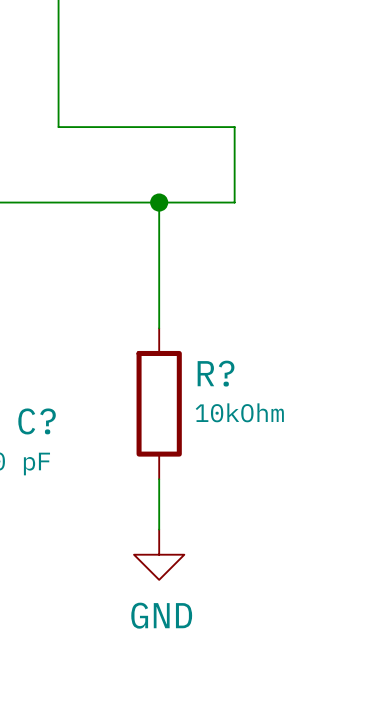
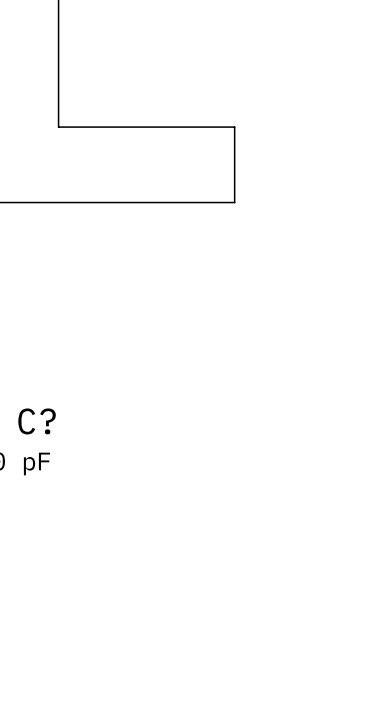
wire: (159, 202) (159, 328) -> none
junction: (159, 202) -> none
R?: 10kOhm (159, 403) -> none
wire: (159, 479) (159, 529) -> none
power symbol: GND (159, 554) -> none

